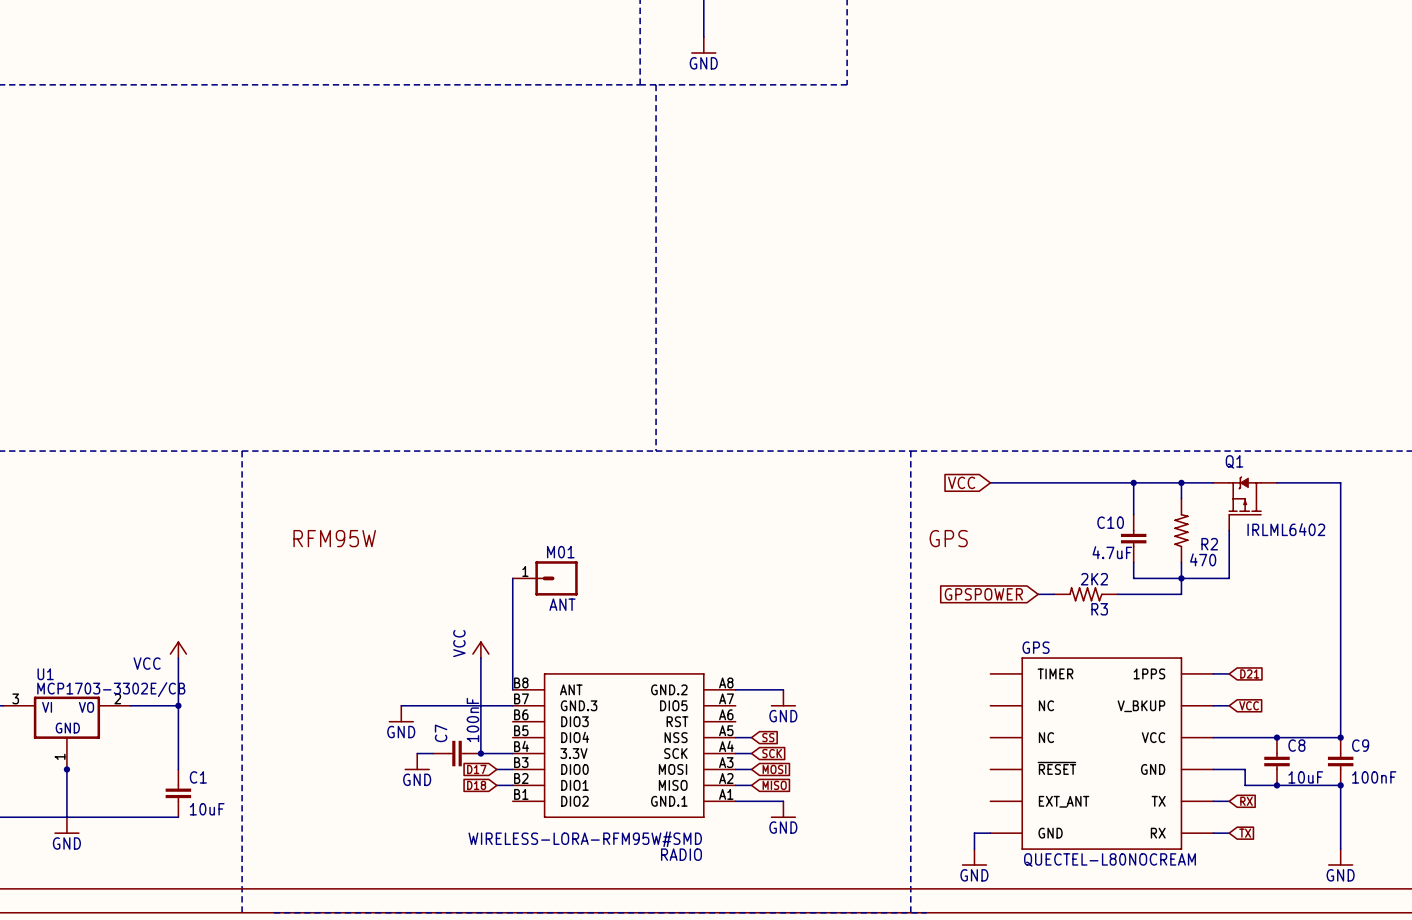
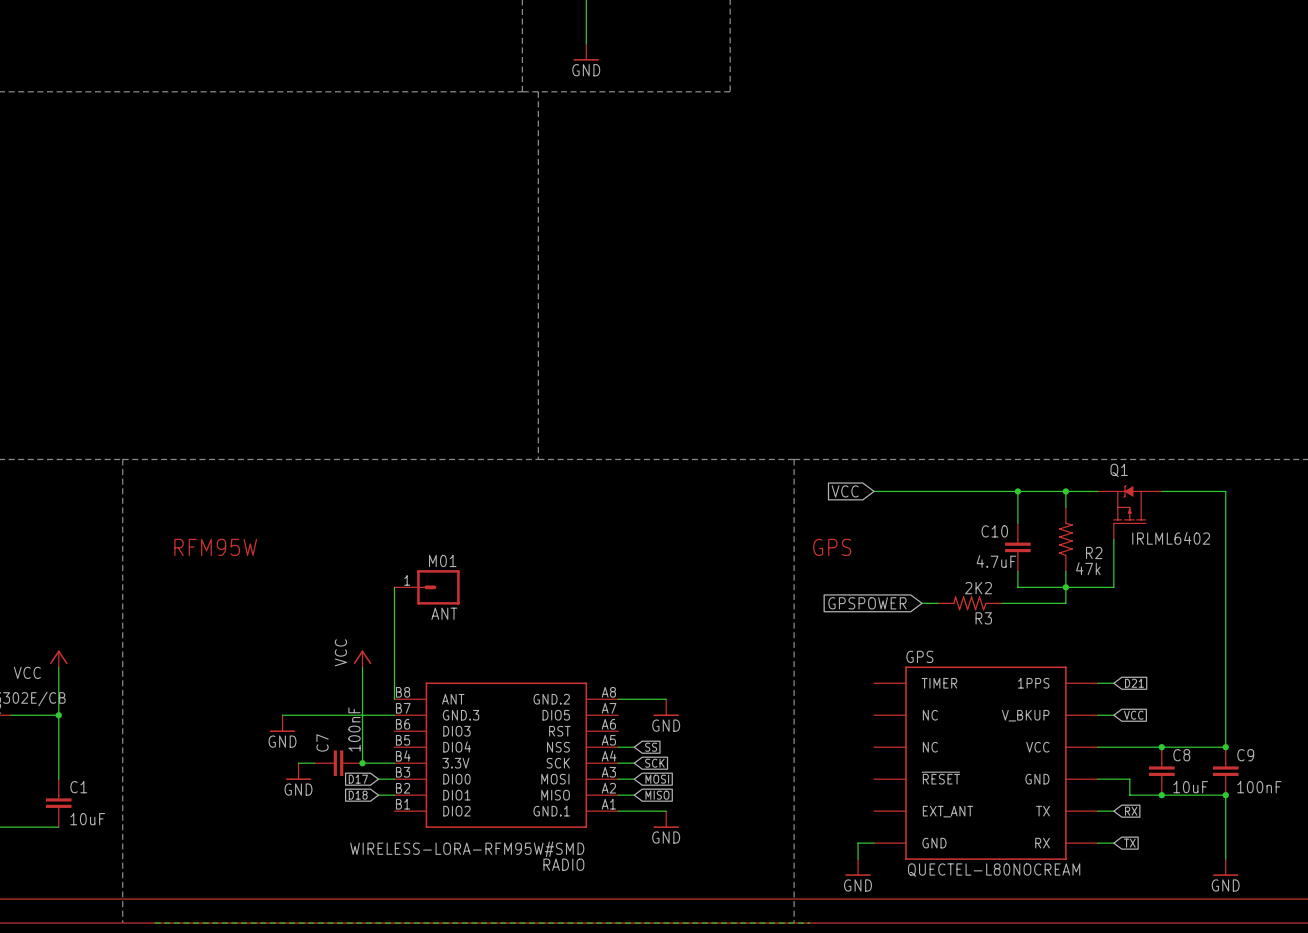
R2 value: 470 (1203, 559) -> 47k (1088, 568)

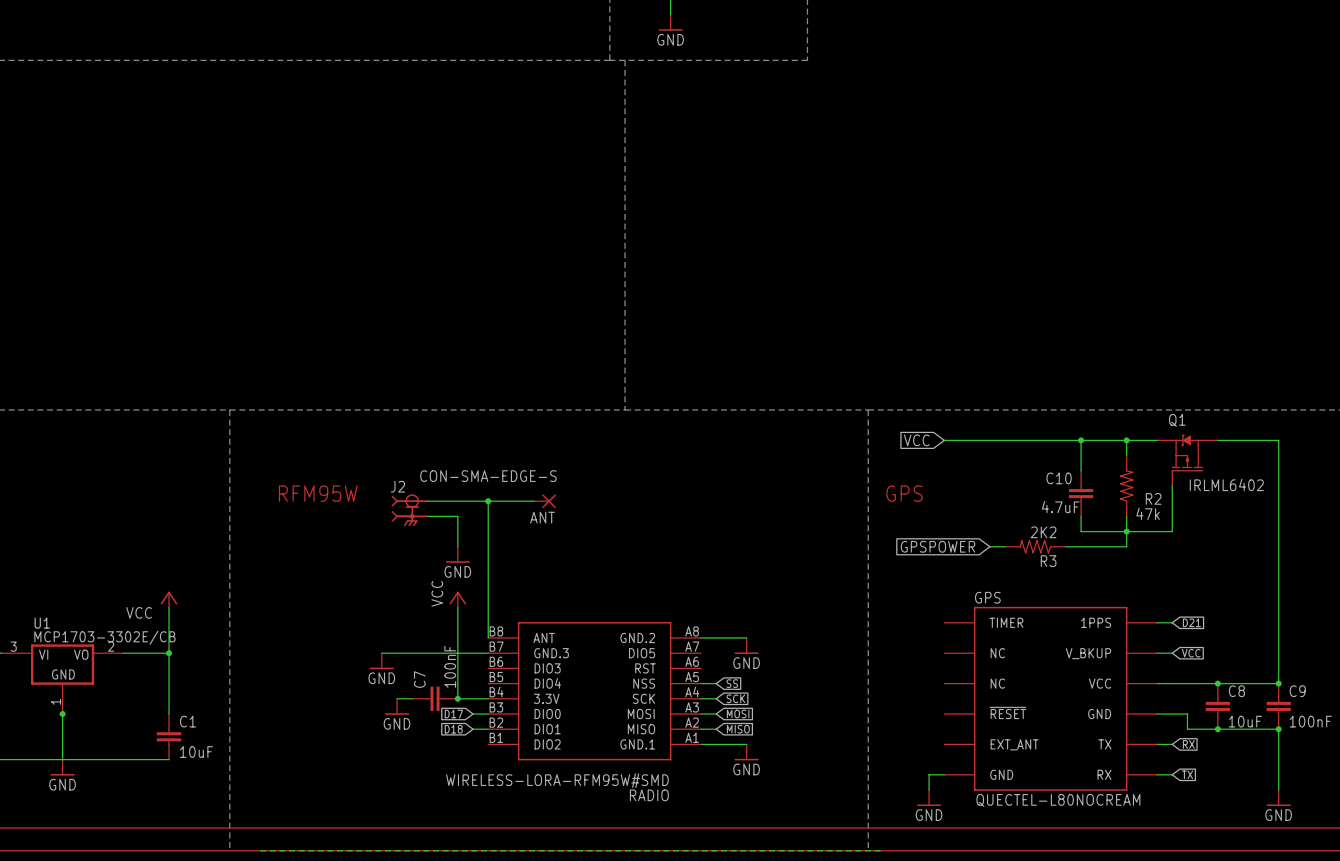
wire: none -> (427, 501) (533, 501)
wire: none -> (488, 501) (488, 531)
junction: none -> (488, 501)
ANT: none -> (544, 501)
J2: none -> CON-SMA-EDGE-S (409, 510)
wire: none -> (427, 516) (457, 516) (457, 546)
ANT: M01 (427, 587) -> none
power symbol: none -> GND (457, 554)

